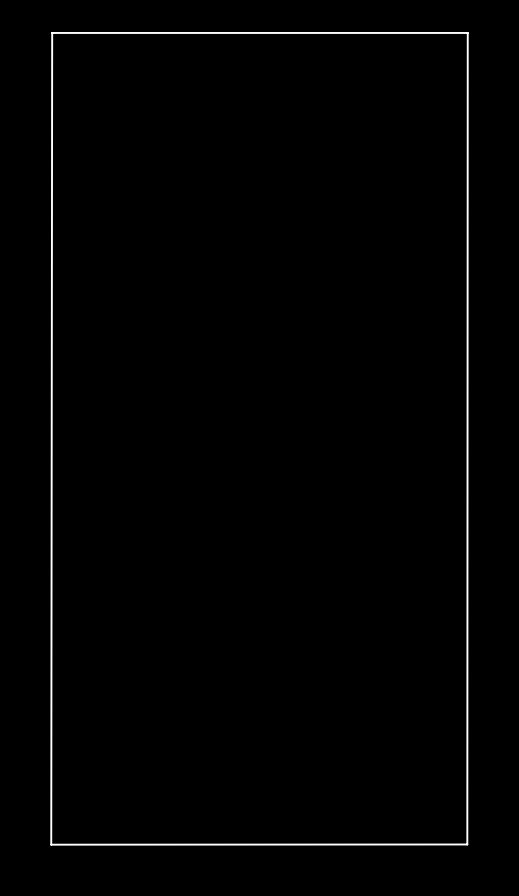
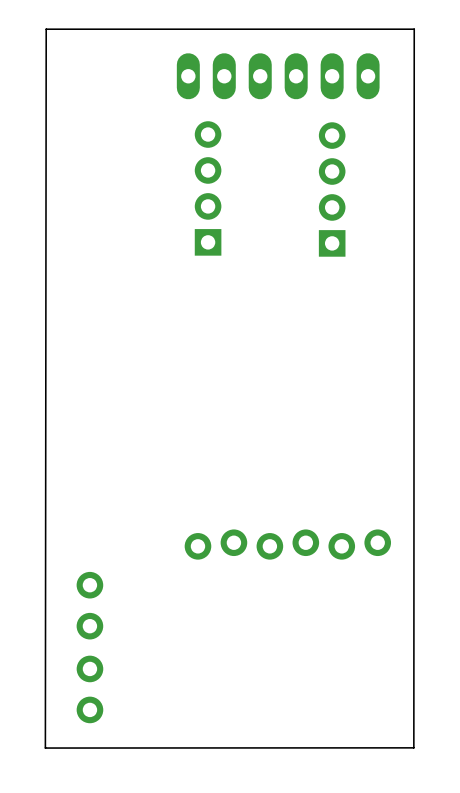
part: none -> (278, 76)
part: none -> (208, 188)
part: none -> (332, 189)
part: none -> (287, 544)
part: none -> (89, 605)
part: none -> (89, 689)

